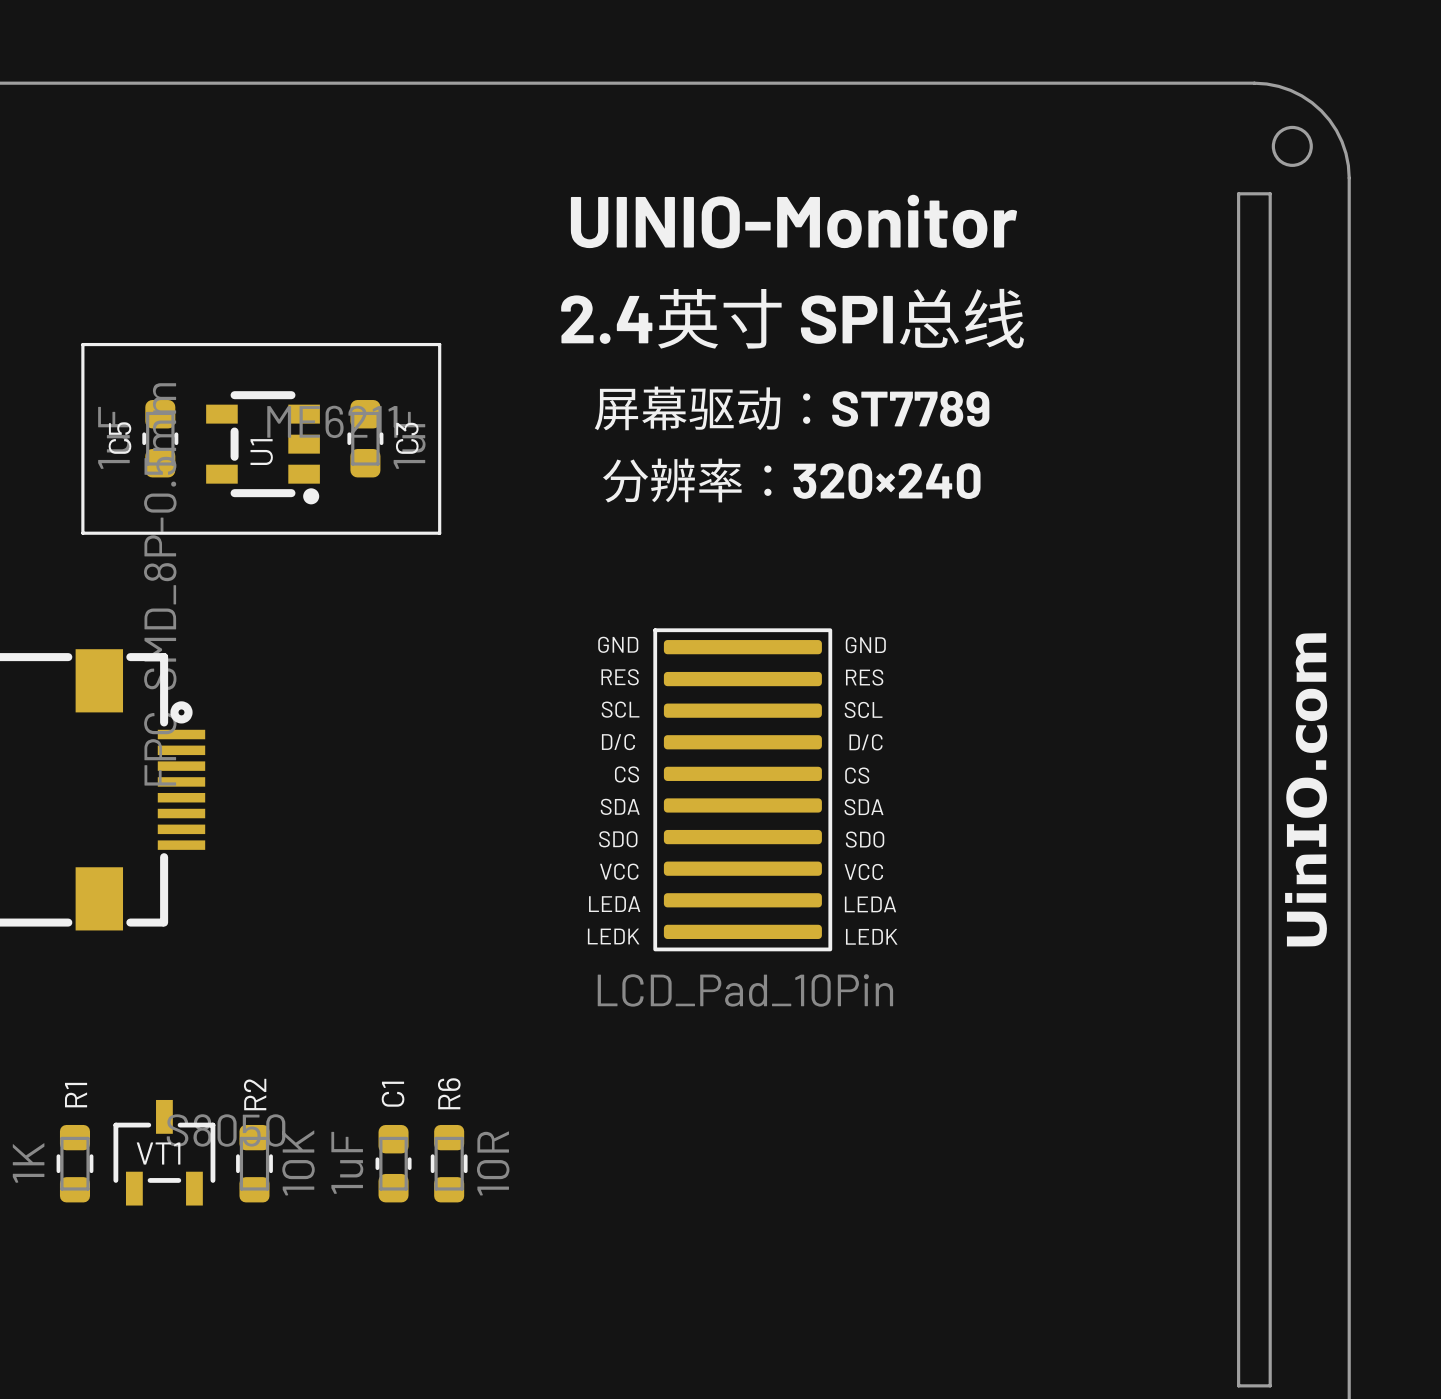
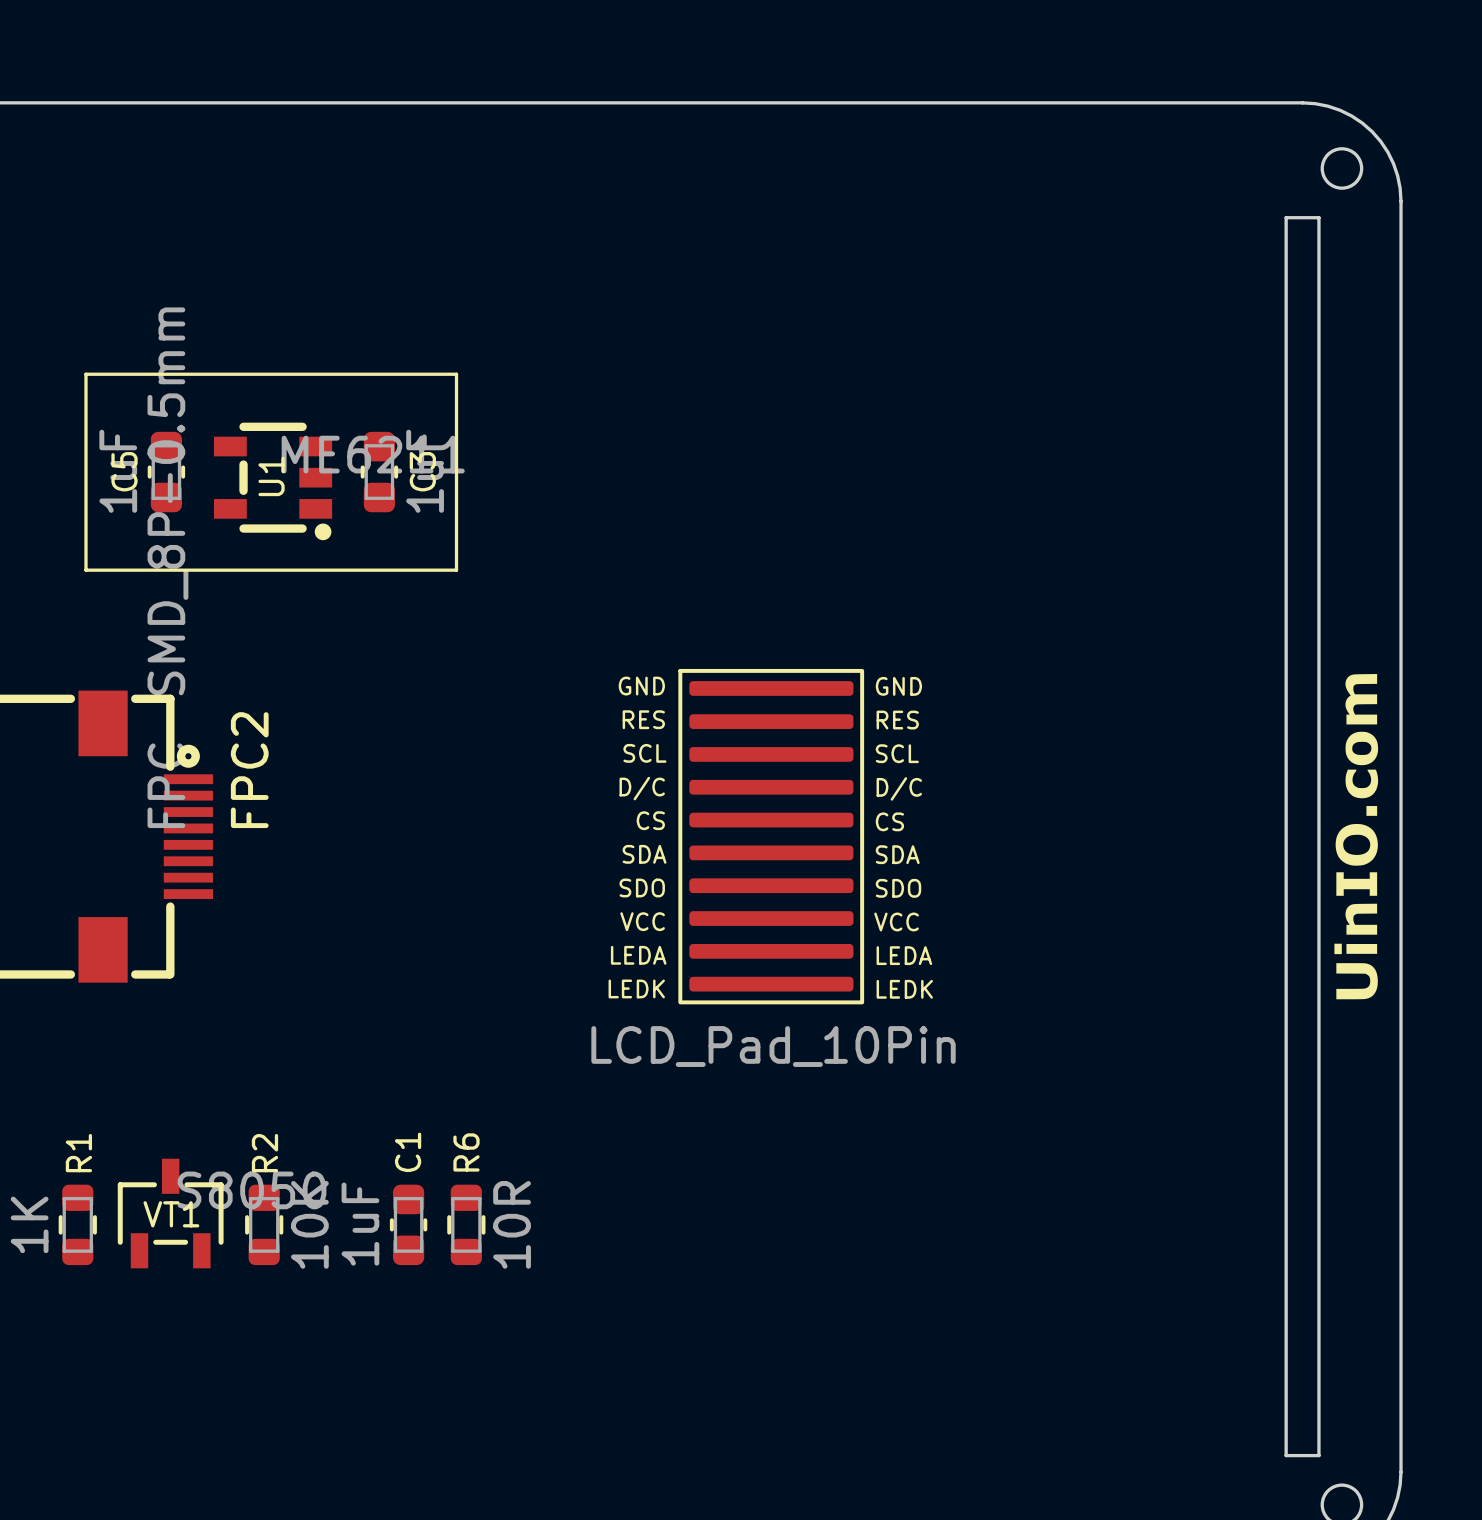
text: UINIO-Monitor (794, 221) -> none
text: 2.4英寸 SPI总线 (792, 318) -> none
text: 屏幕驱动：ST7789 (792, 408) -> none
text: 分辨率：320×240 (791, 480) -> none
FPC2 name: none -> FPC2 (249, 770)

